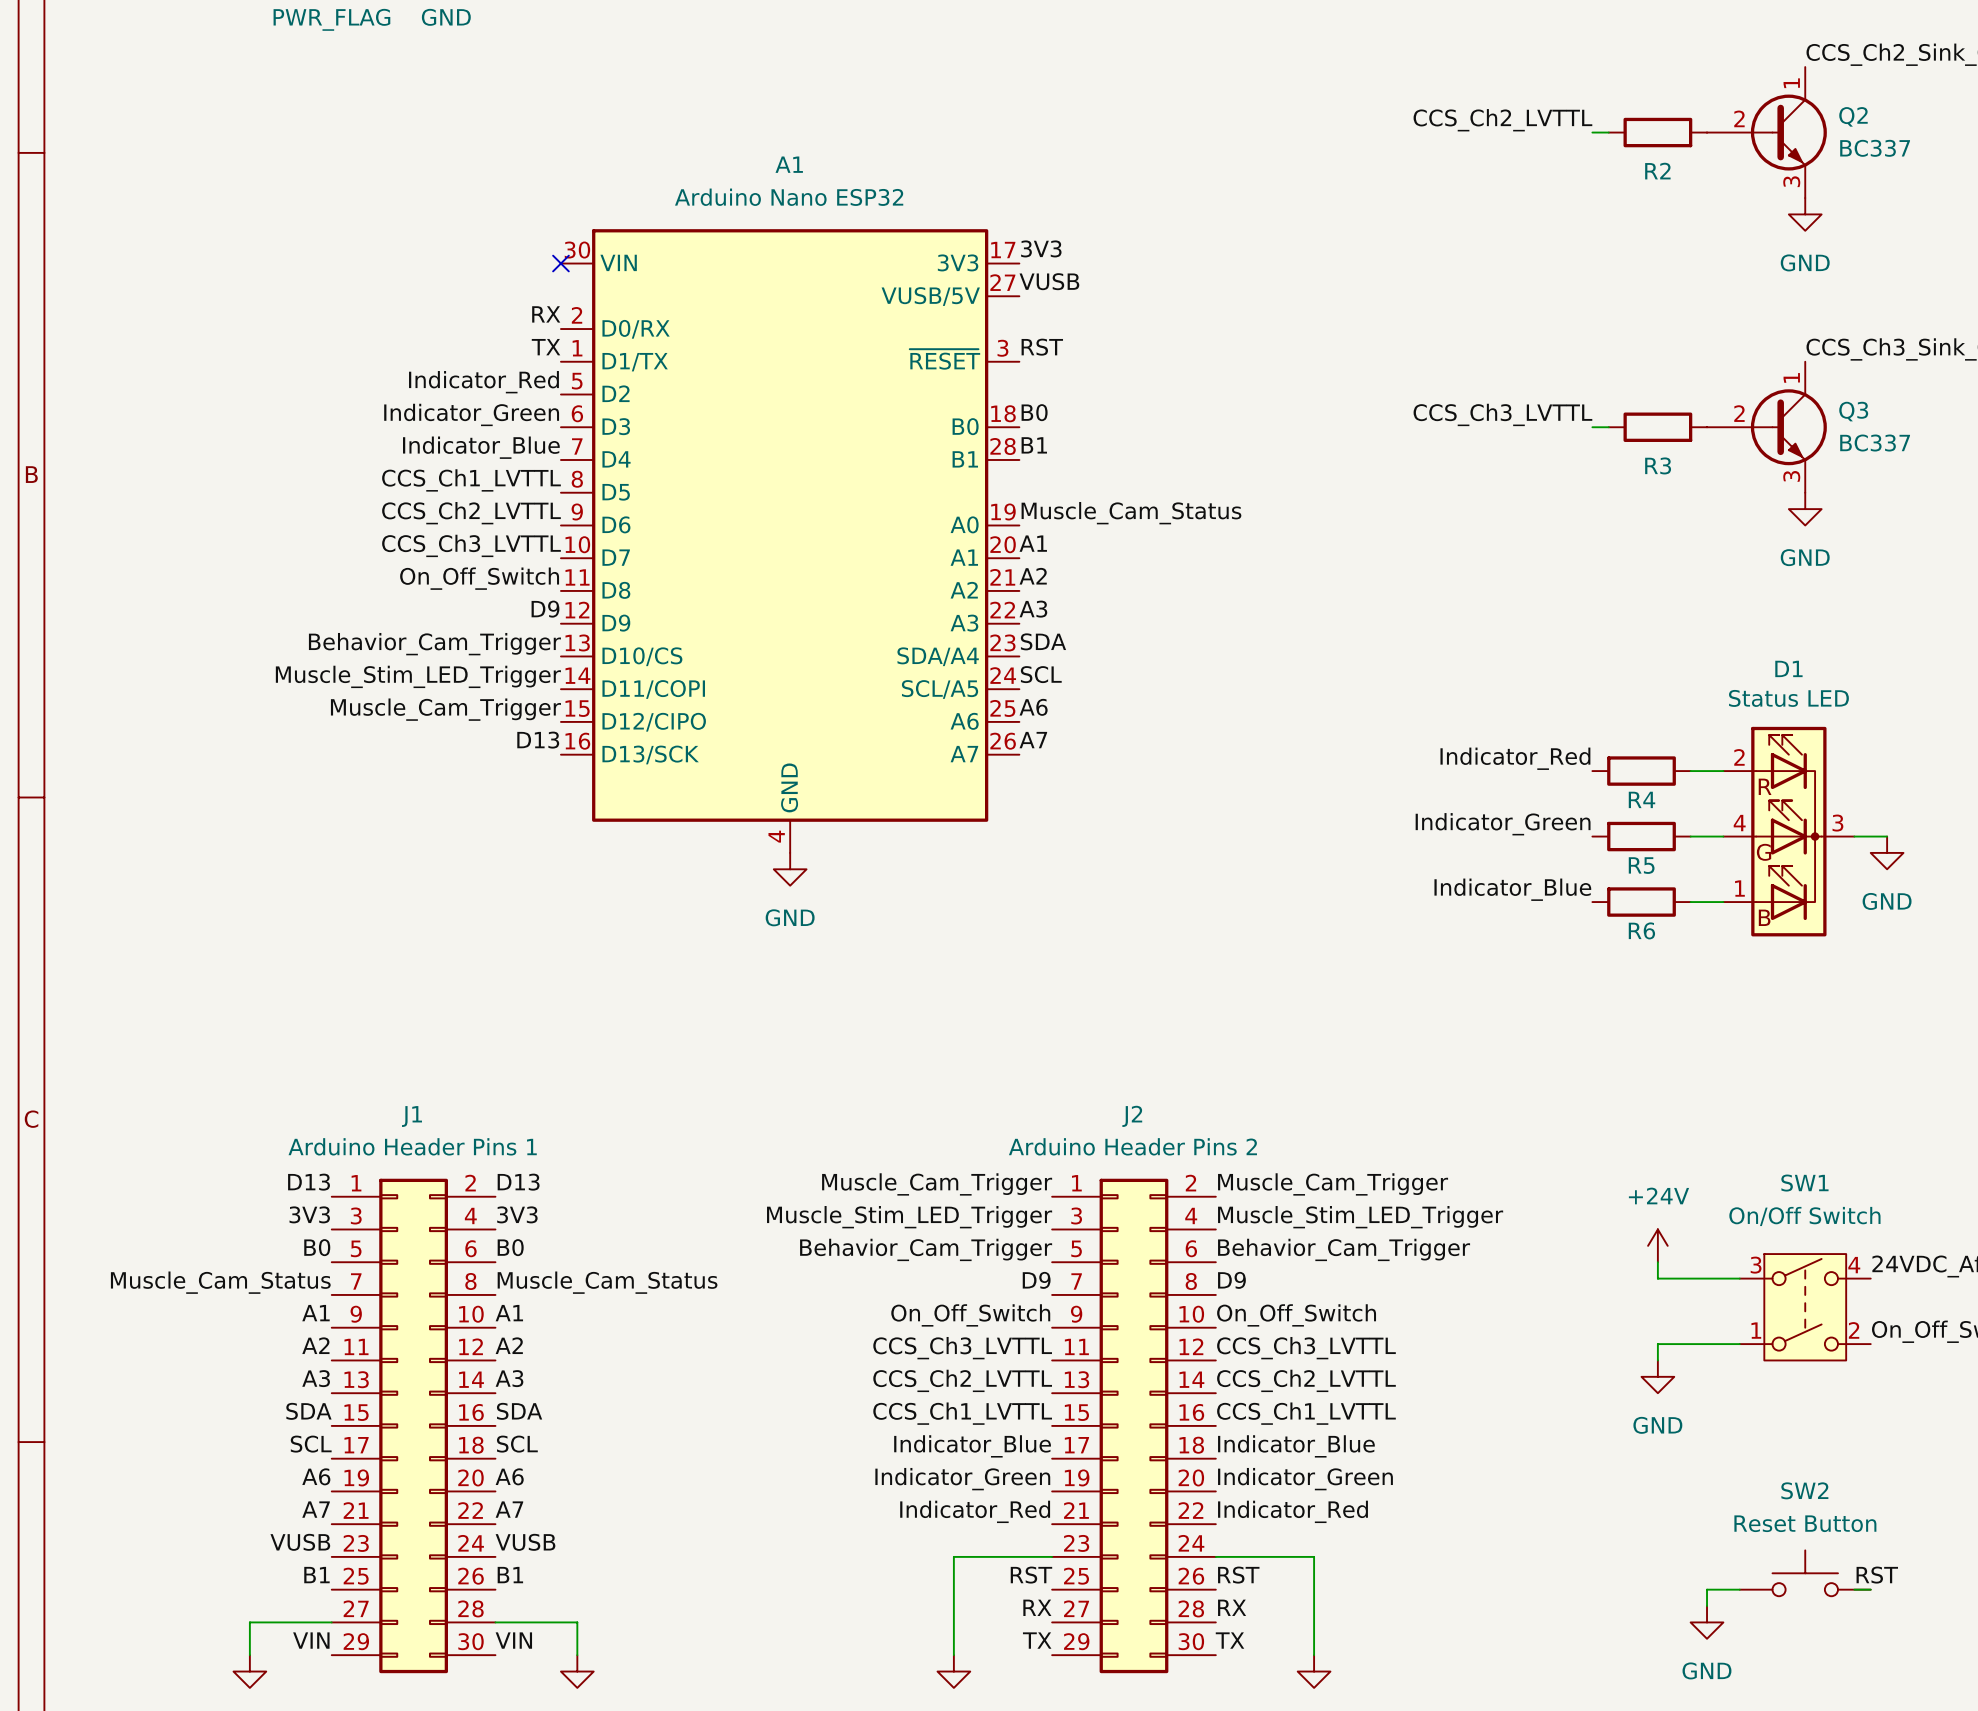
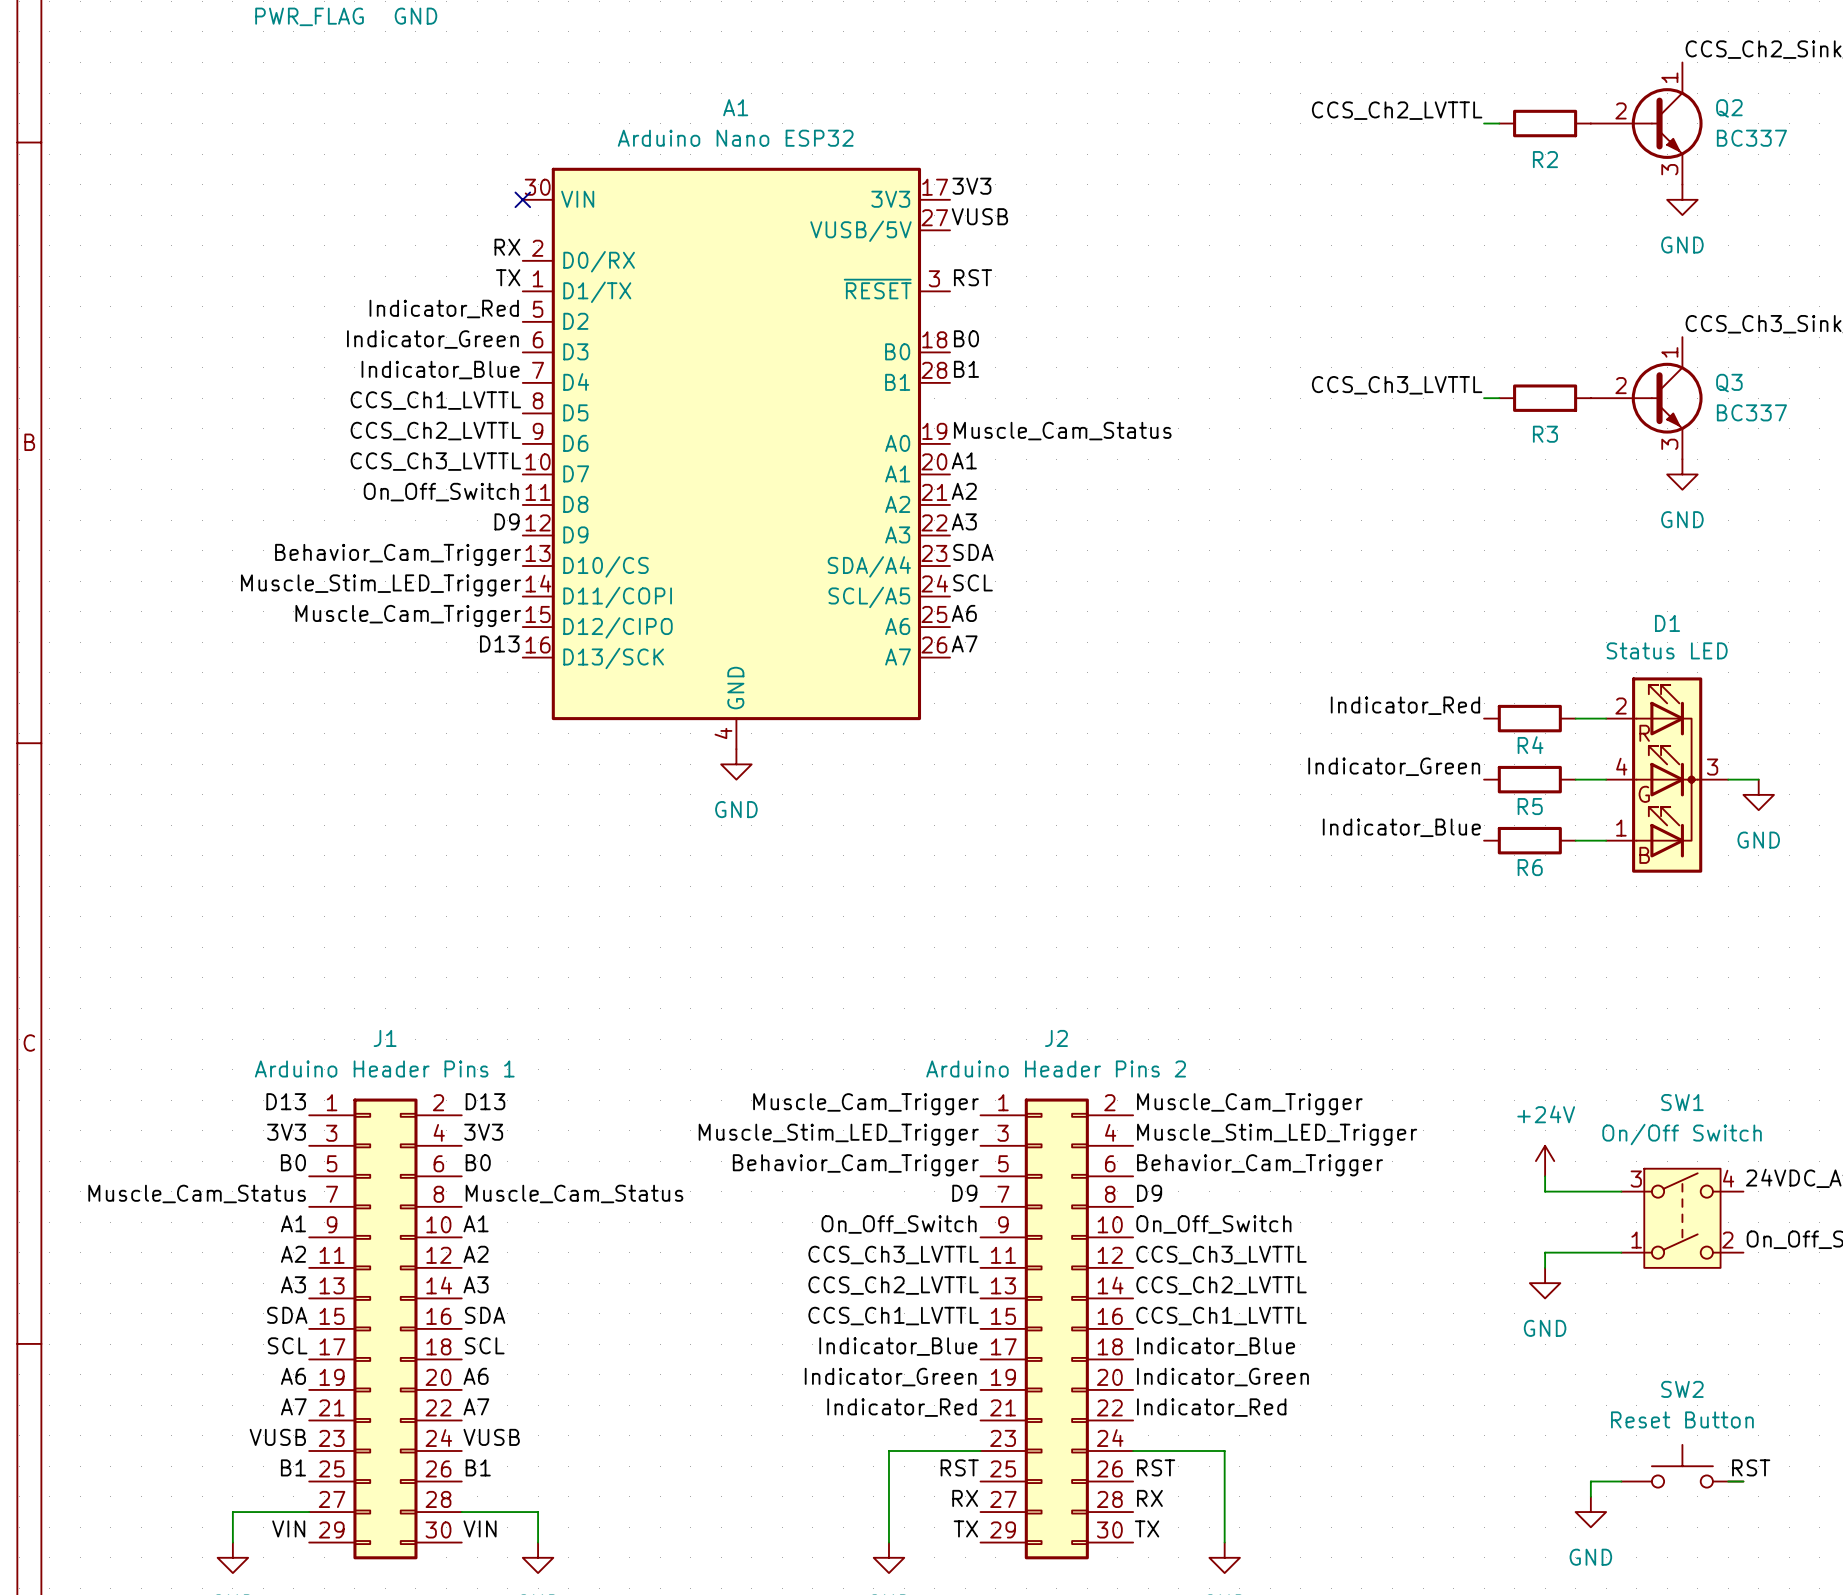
label position: 3V3 (1041, 248) -> 3V3 (971, 186)
no-connect mark position: (560, 263) -> (522, 199)
label position: VUSB (1049, 281) -> VUSB (979, 216)
label position: RX (546, 314) -> RX (507, 247)
label position: TX (546, 347) -> TX (508, 277)
label position: RST (1042, 347) -> RST (973, 277)
label position: Indicator_Red (483, 382) -> Indicator_Red (444, 309)
label position: B0 (1034, 412) -> B0 (966, 338)
label position: Indicator_Green (471, 414) -> Indicator_Green (432, 339)
label position: B1 (1034, 445) -> B1 (966, 369)
label position: Indicator_Blue (481, 447) -> Indicator_Blue (440, 370)
label position: CCS_Ch1_LVTTL (471, 480) -> CCS_Ch1_LVTTL (435, 400)
label position: CCS_Ch2_LVTTL (471, 513) -> CCS_Ch2_LVTTL (435, 431)
label position: Muscle_Cam_Status (1131, 513) -> Muscle_Cam_Status (1062, 431)
A1 position: (790, 541) -> (736, 458)
label position: A1 (1033, 543) -> A1 (964, 460)
label position: CCS_Ch3_LVTTL (471, 545) -> CCS_Ch3_LVTTL (435, 461)
label position: A2 (1033, 576) -> A2 (964, 491)
label position: On_Off_Switch (479, 578) -> On_Off_Switch (441, 492)
label position: D9 (545, 609) -> D9 (507, 521)
label position: A3 (1033, 609) -> A3 (964, 521)
label position: SDA (1043, 641) -> SDA (973, 552)
label position: Behavior_Cam_Trigger (434, 644) -> Behavior_Cam_Trigger (398, 554)
label position: SCL (1041, 674) -> SCL (973, 582)
label position: Muscle_Stim_LED_Trigger (418, 676) -> Muscle_Stim_LED_Trigger (380, 585)
label position: A6 (1033, 707) -> A6 (964, 613)
label position: Muscle_Cam_Trigger (445, 709) -> Muscle_Cam_Trigger (408, 615)
label position: D13 (538, 740) -> D13 (499, 643)
label position: A7 (1033, 740) -> A7 (964, 643)
power symbol position: GND (790, 869) -> GND (736, 764)

